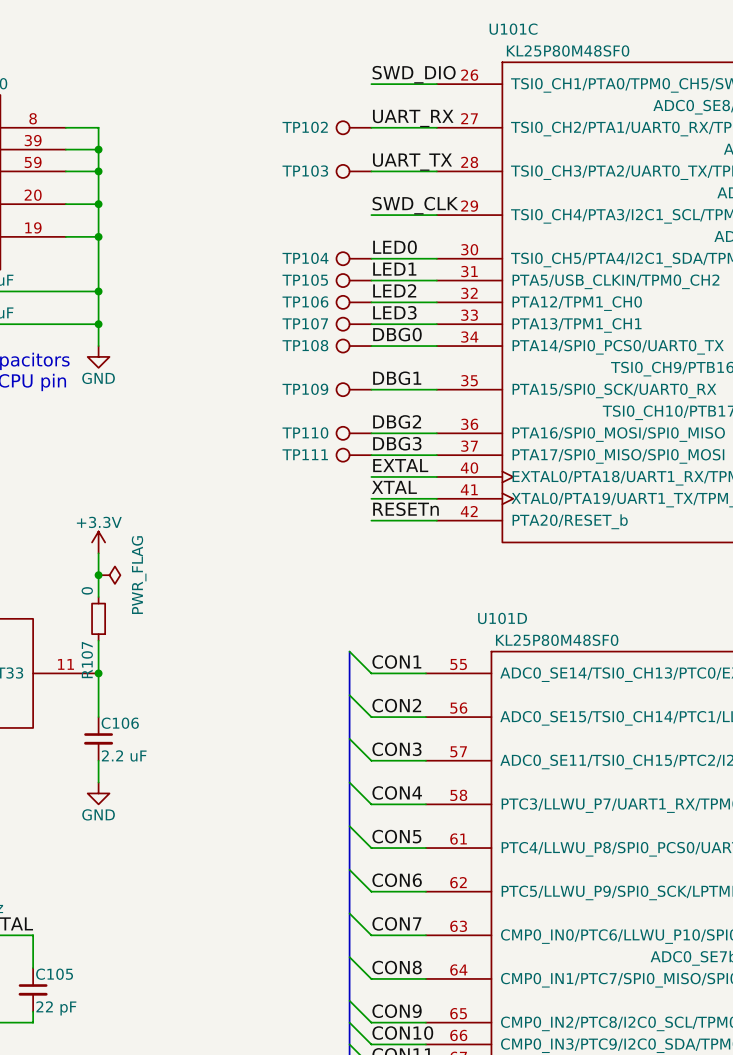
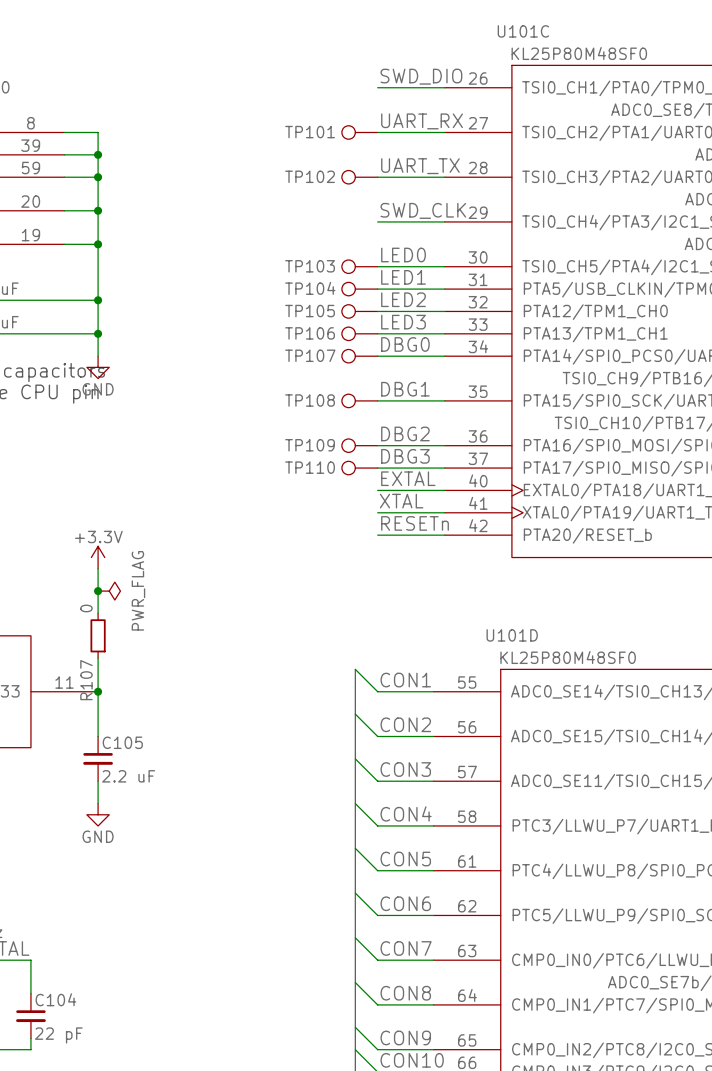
TP102 name: TP102 (305, 127) -> TP101 (310, 132)
TP103 name: TP103 (305, 171) -> TP102 (310, 176)
TP104 name: TP104 (305, 258) -> TP103 (310, 266)
TP105 name: TP105 (305, 280) -> TP104 (310, 288)
TP106 name: TP106 (305, 301) -> TP105 (310, 311)
TP107 name: TP107 (305, 323) -> TP106 (310, 333)
TP108 name: TP108 (305, 345) -> TP107 (310, 355)
TP109 name: TP109 (305, 389) -> TP108 (310, 400)
TP110 name: TP110 (305, 432) -> TP109 (310, 445)
TP111 name: TP111 (305, 454) -> TP110 (310, 467)
C106 name: C106 (120, 723) -> C105 (122, 742)
C105 name: C105 (54, 974) -> C104 (55, 999)

